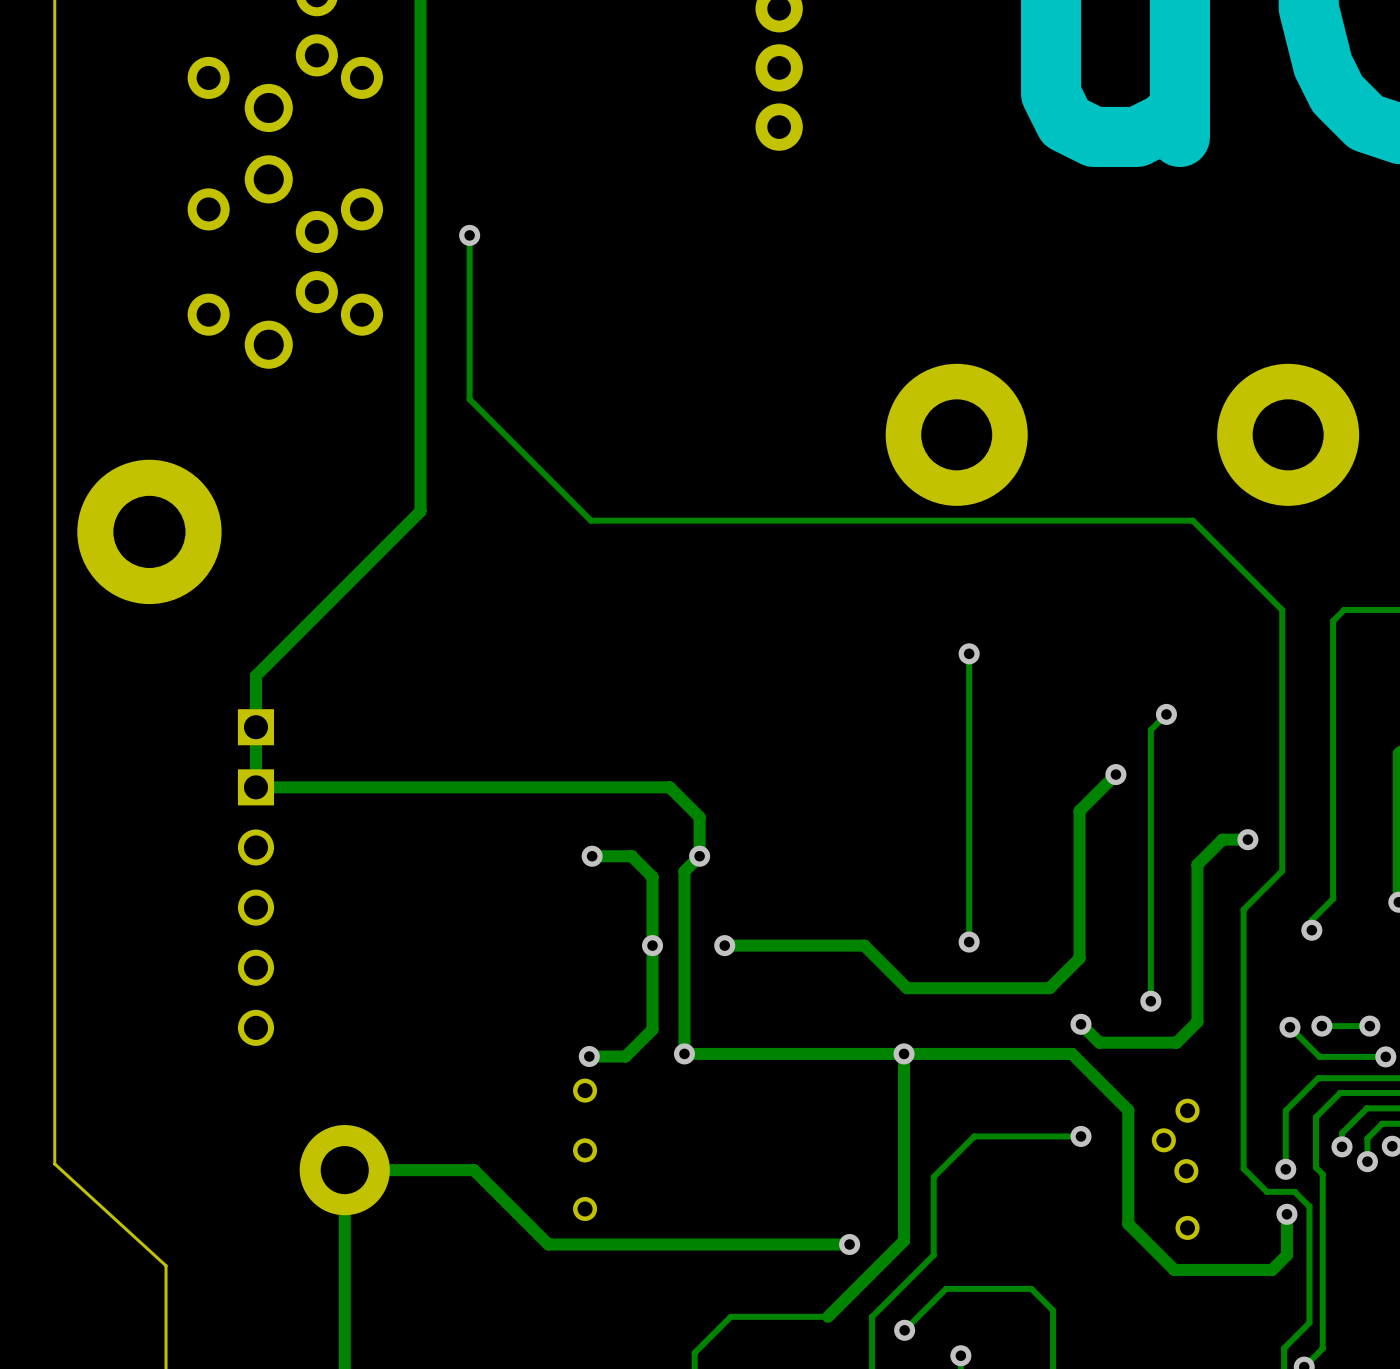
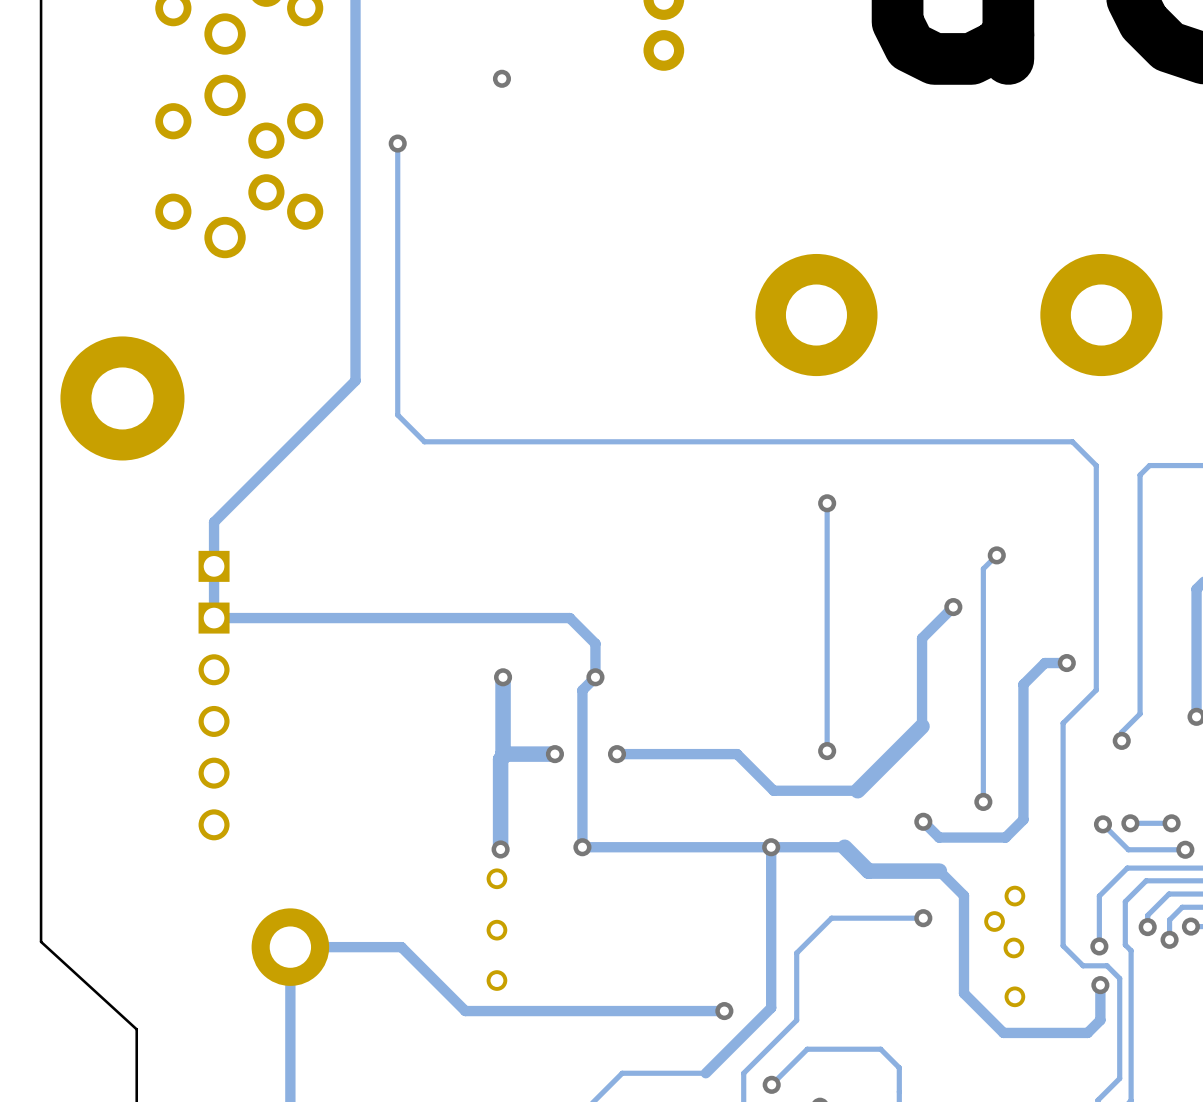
via: none -> (501, 78)
track: (469, 399) (590, 520) (1192, 520) (1254, 582) -> (397, 284) (397, 415) (424, 441) (1072, 441)
track: (592, 856) (631, 856) (652, 876) (652, 1029) (625, 1056) (589, 1056) -> (505, 754) (500, 759) (500, 849)
track: none -> (503, 677) (503, 755) (554, 754)
track: (1079, 913) (1079, 958) (1049, 988) (1004, 988) -> (922, 726) (857, 790)
track: (989, 1053) (1071, 1053) (1099, 1081) -> (844, 847) (868, 871) (939, 871)

